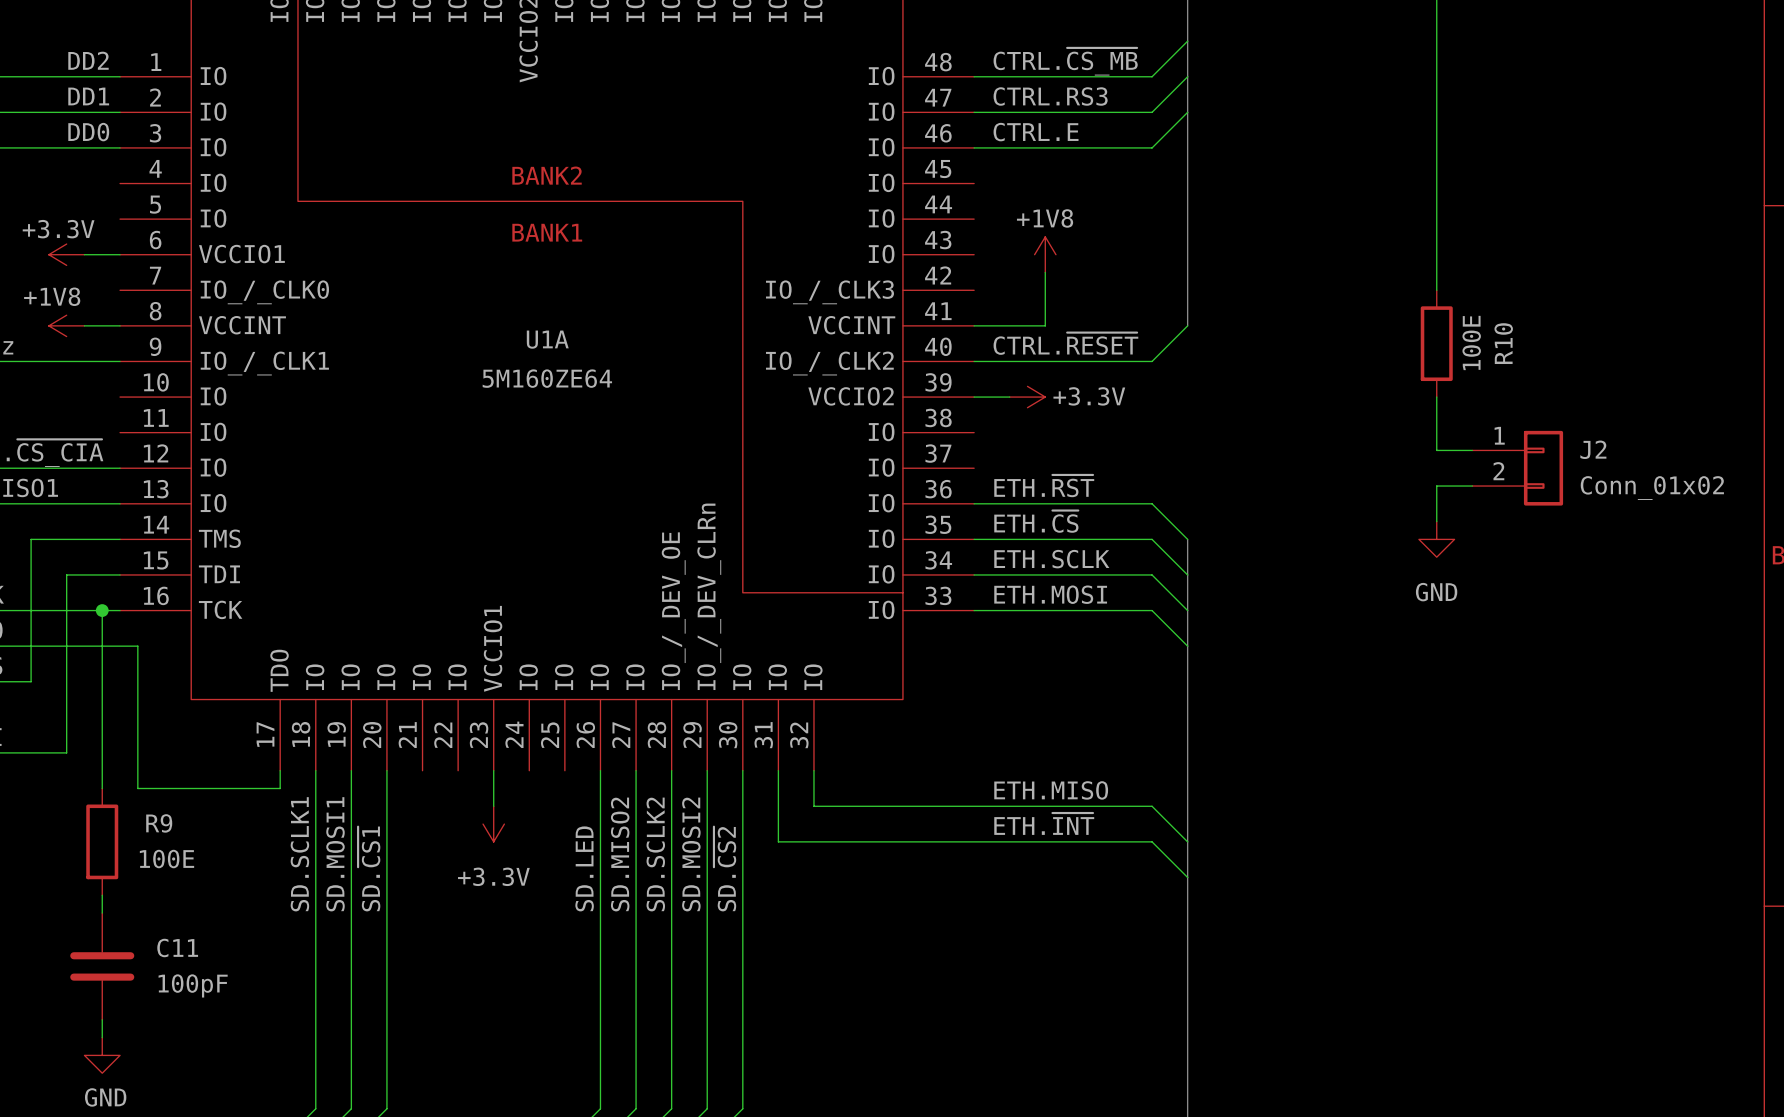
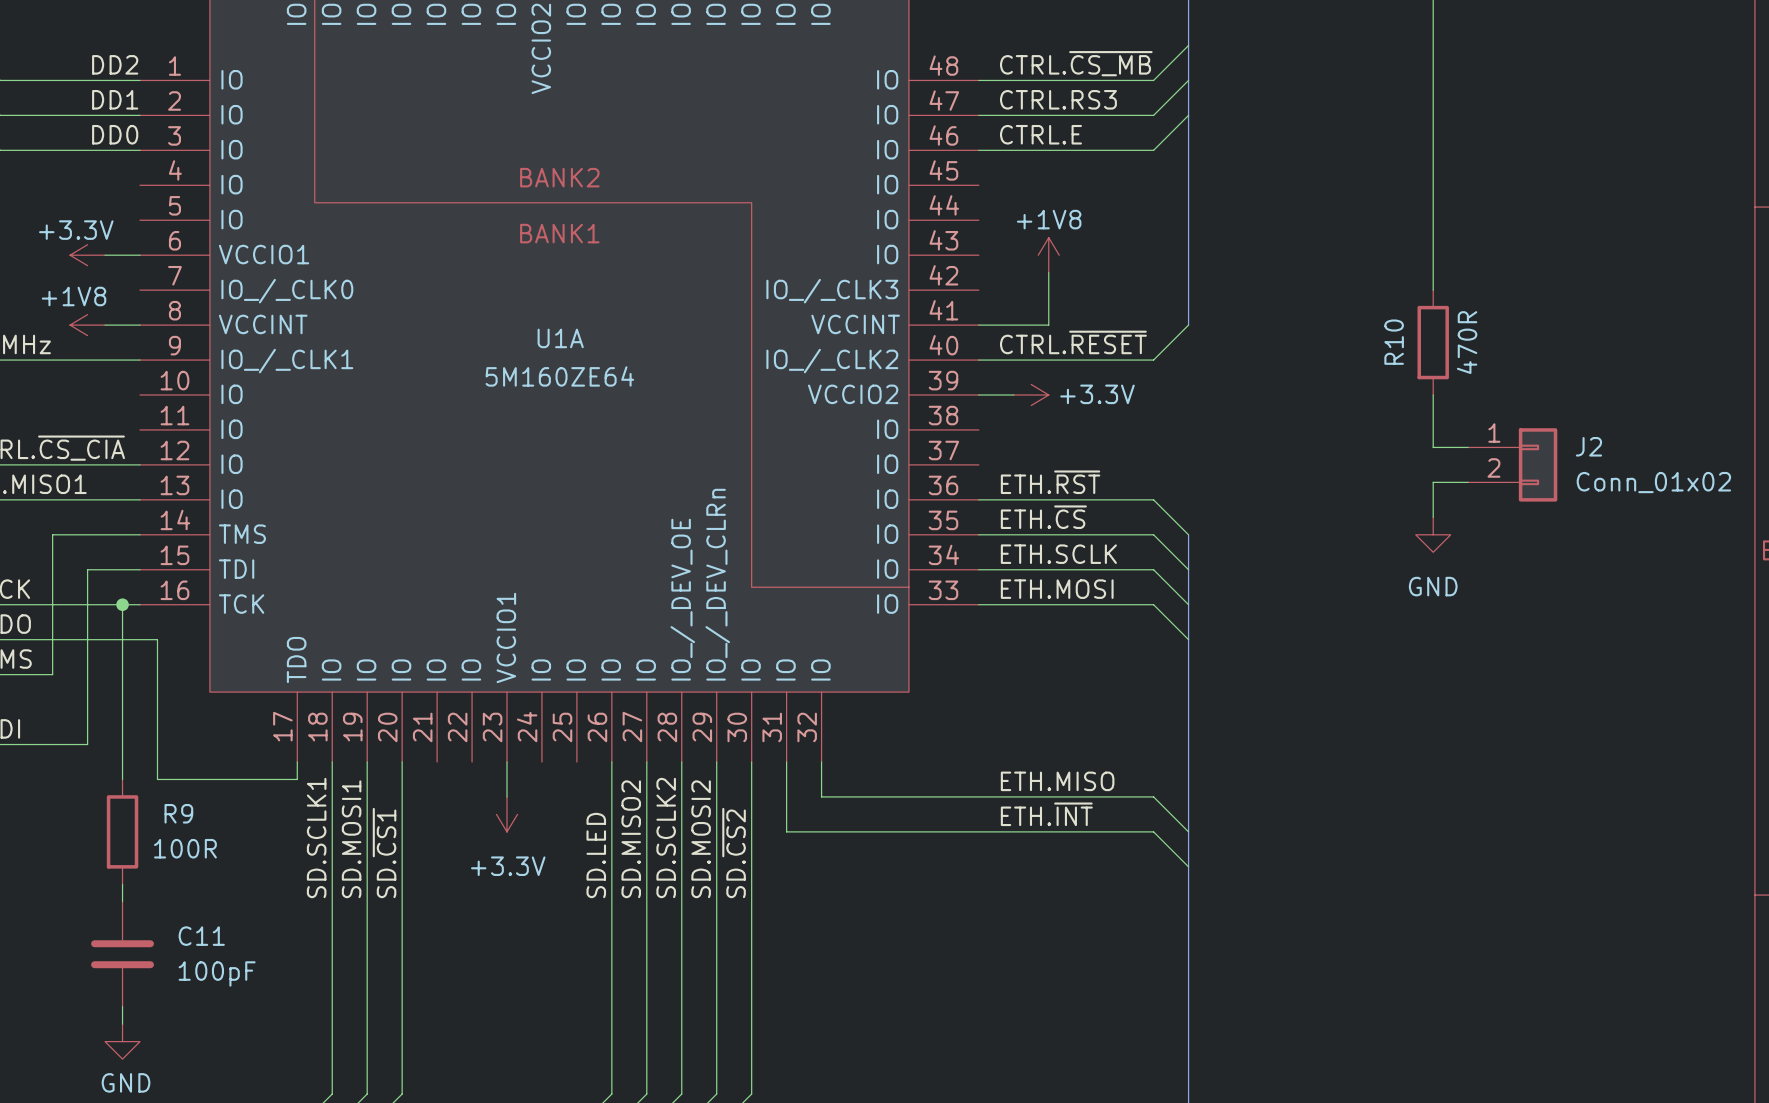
R10 value: 100E (1471, 342) -> 470R (1467, 342)
R10 name position: R10 (1503, 343) -> R10 (1394, 342)
R9 value: 100E (167, 859) -> 100R (185, 848)

